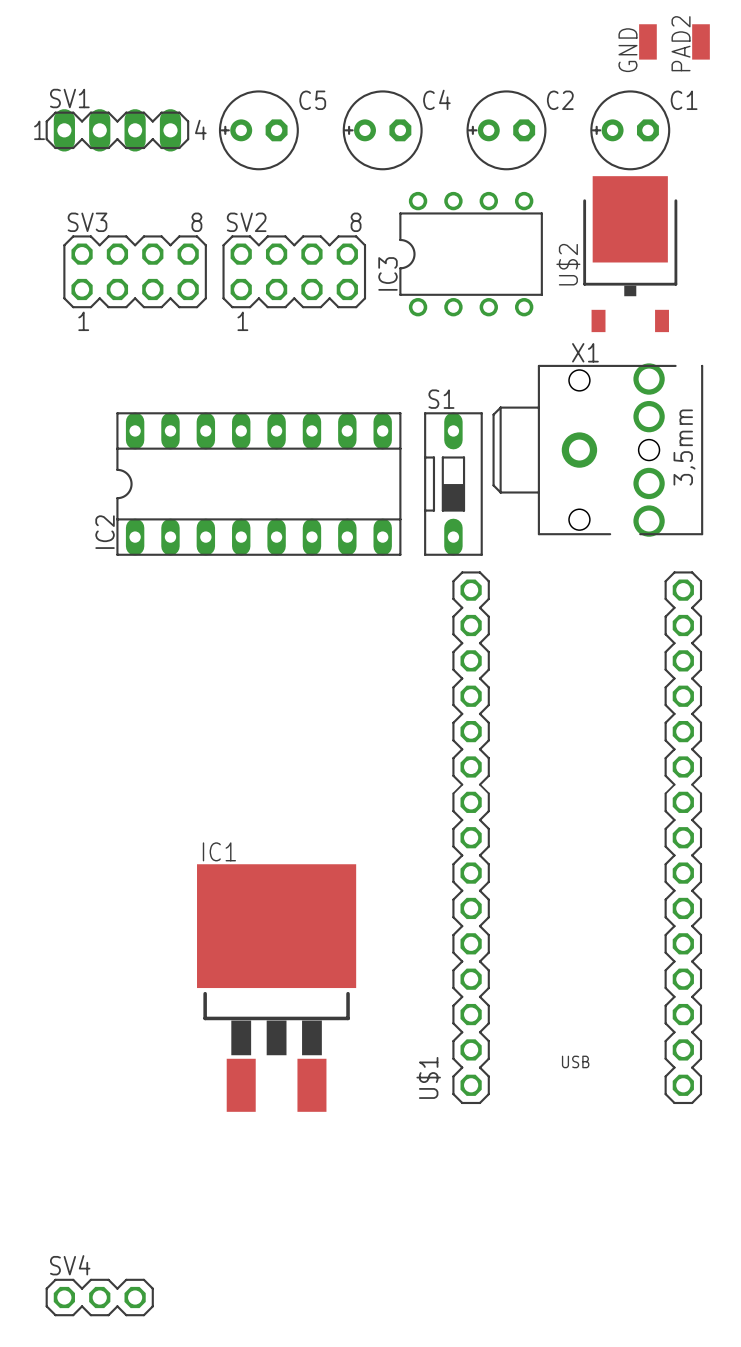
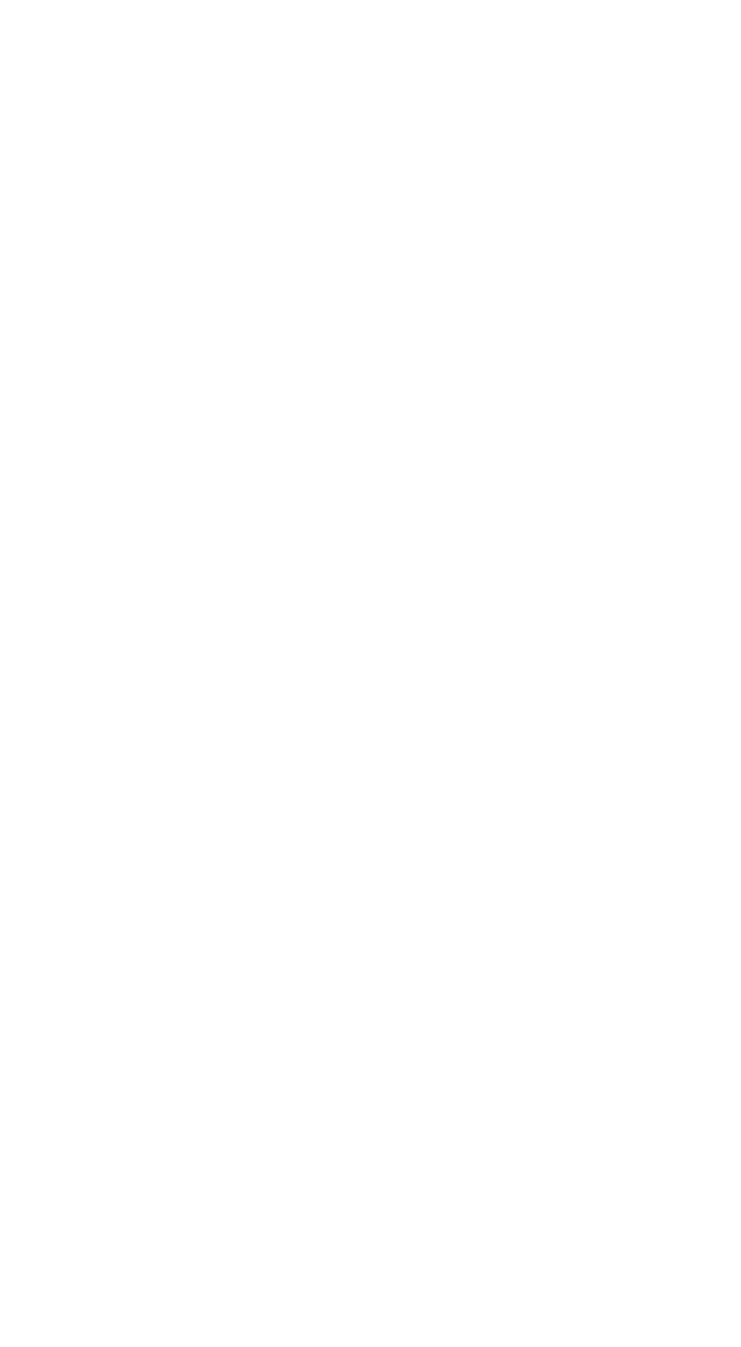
GND: (647, 41) -> none
PAD2: (701, 41) -> none
SV1: (117, 130) -> none
C5: (258, 130) -> none
C4: (382, 130) -> none
C2: (506, 130) -> none
C1: (630, 130) -> none
IC3: (471, 254) -> none
U$2: (630, 254) -> none
SV3: (135, 271) -> none
SV2: (294, 271) -> none
X1: (597, 450) -> none
IC2: (258, 484) -> none
S1: (453, 484) -> none
U$1: (577, 837) -> none
IC1: (276, 988) -> none
SV4: (99, 1297) -> none

